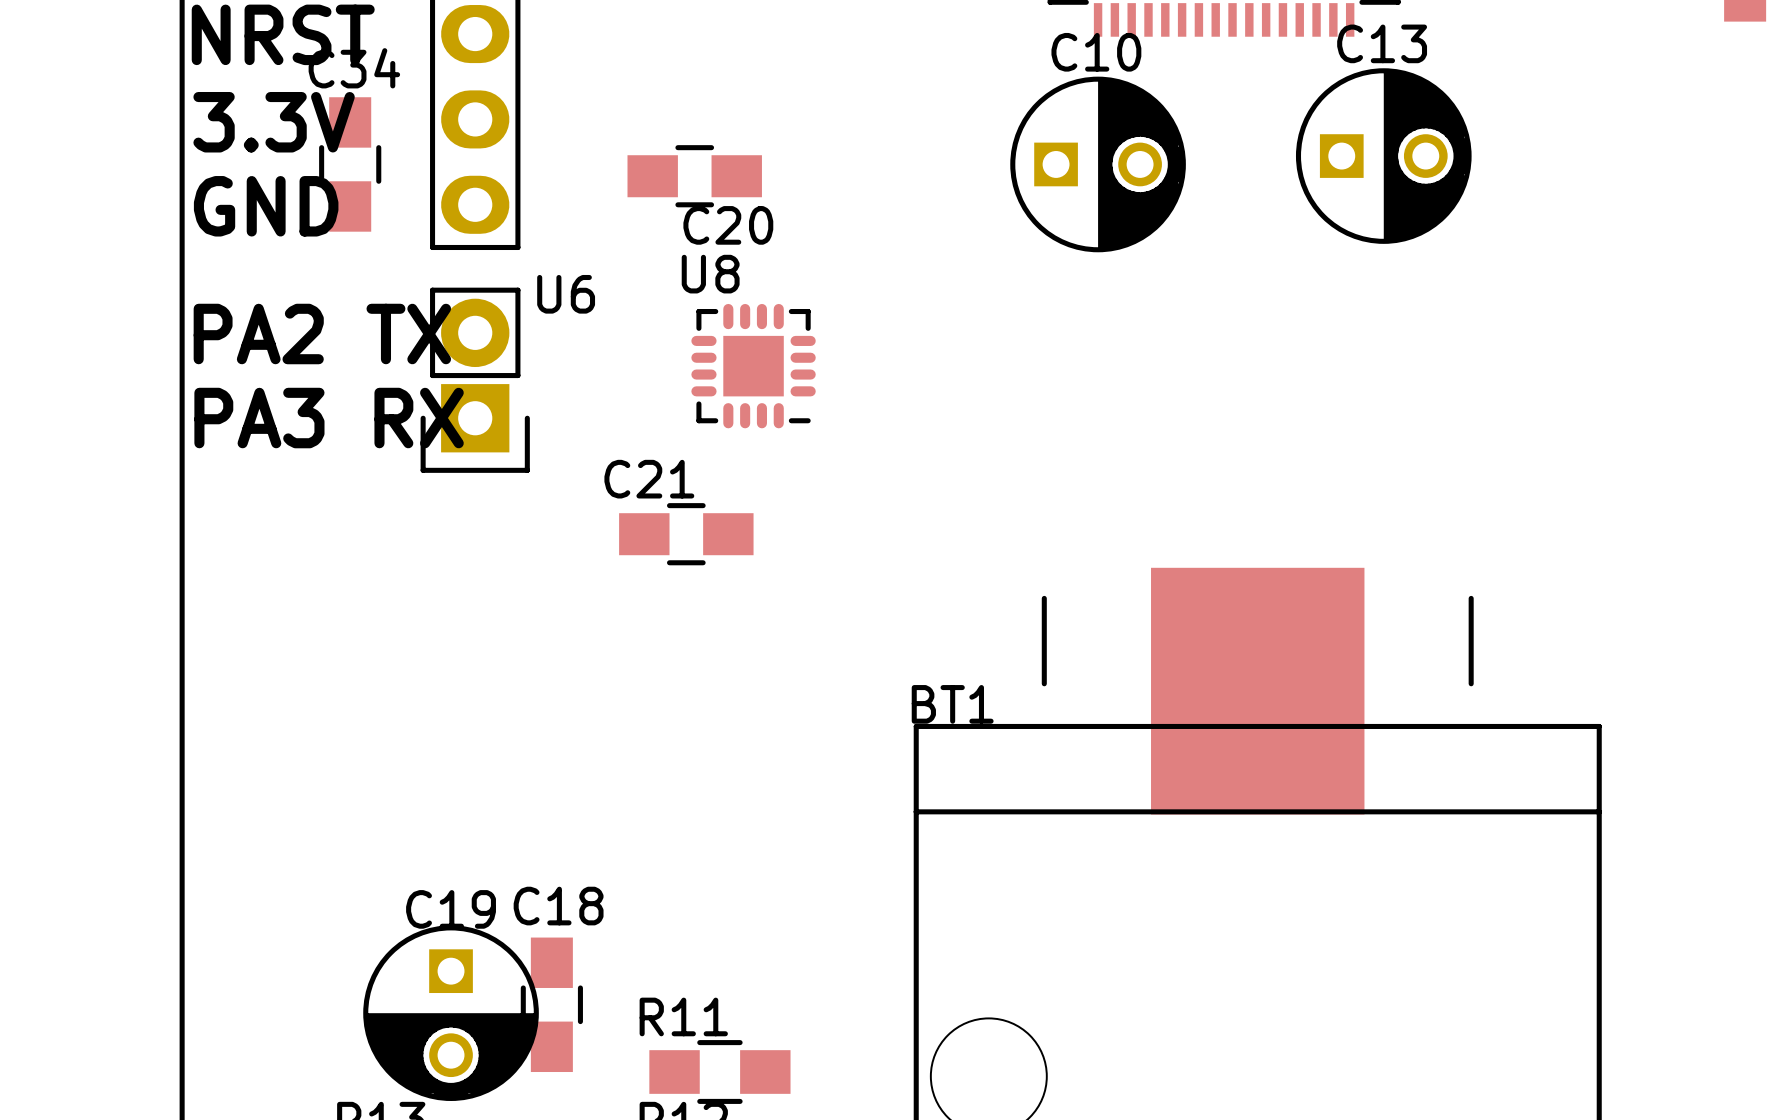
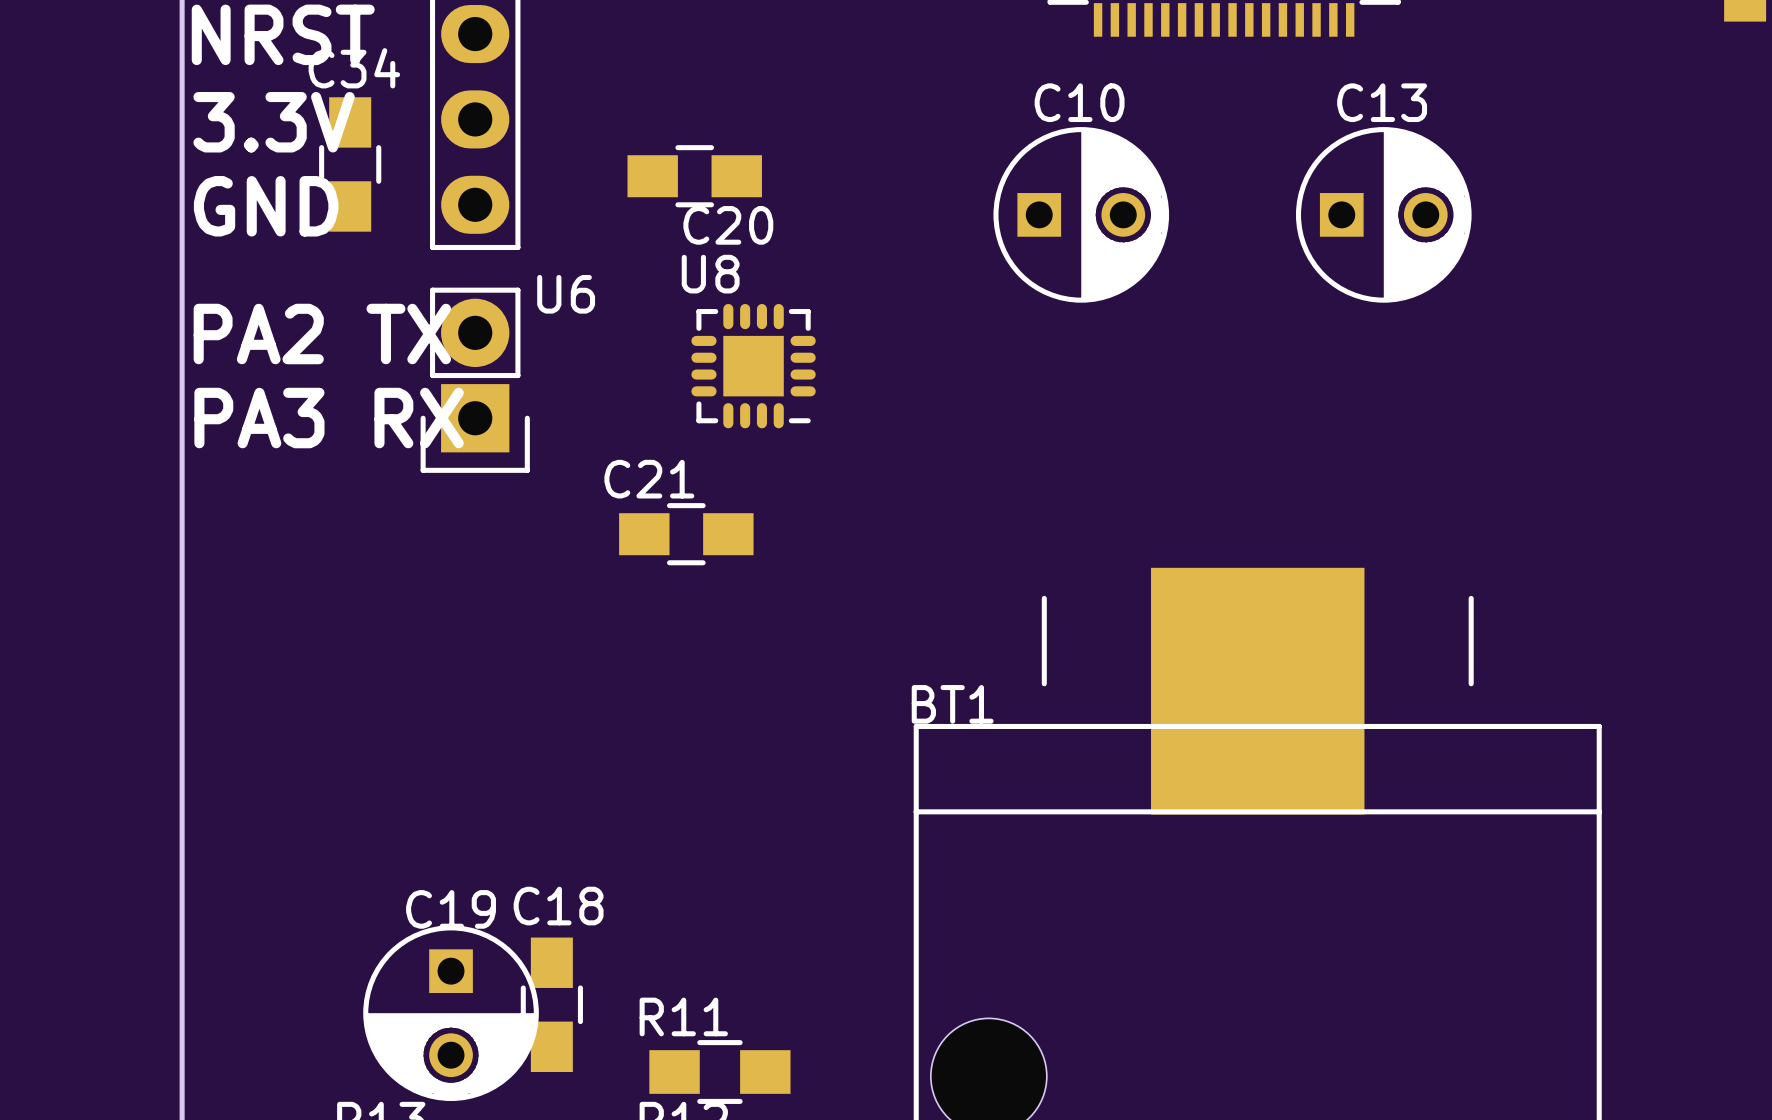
C13 position: (1383, 156) -> (1383, 214)
C10 position: (1098, 164) -> (1081, 214)

